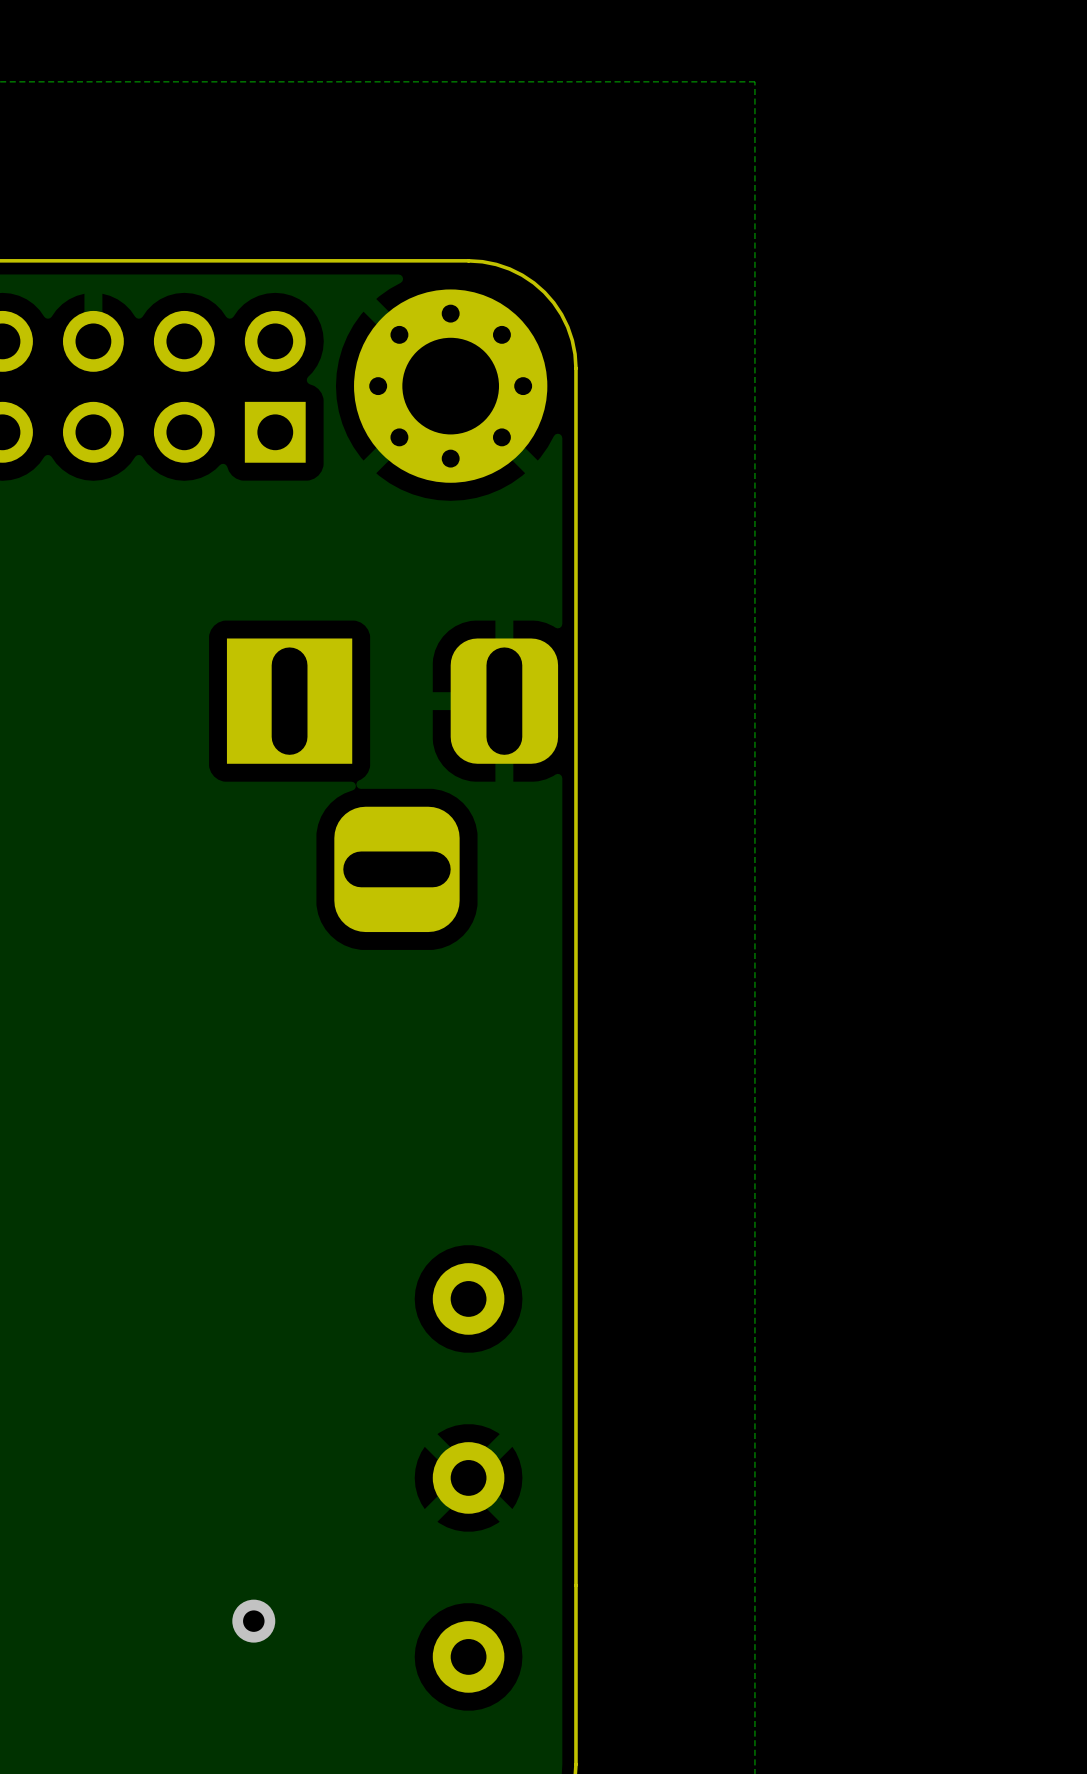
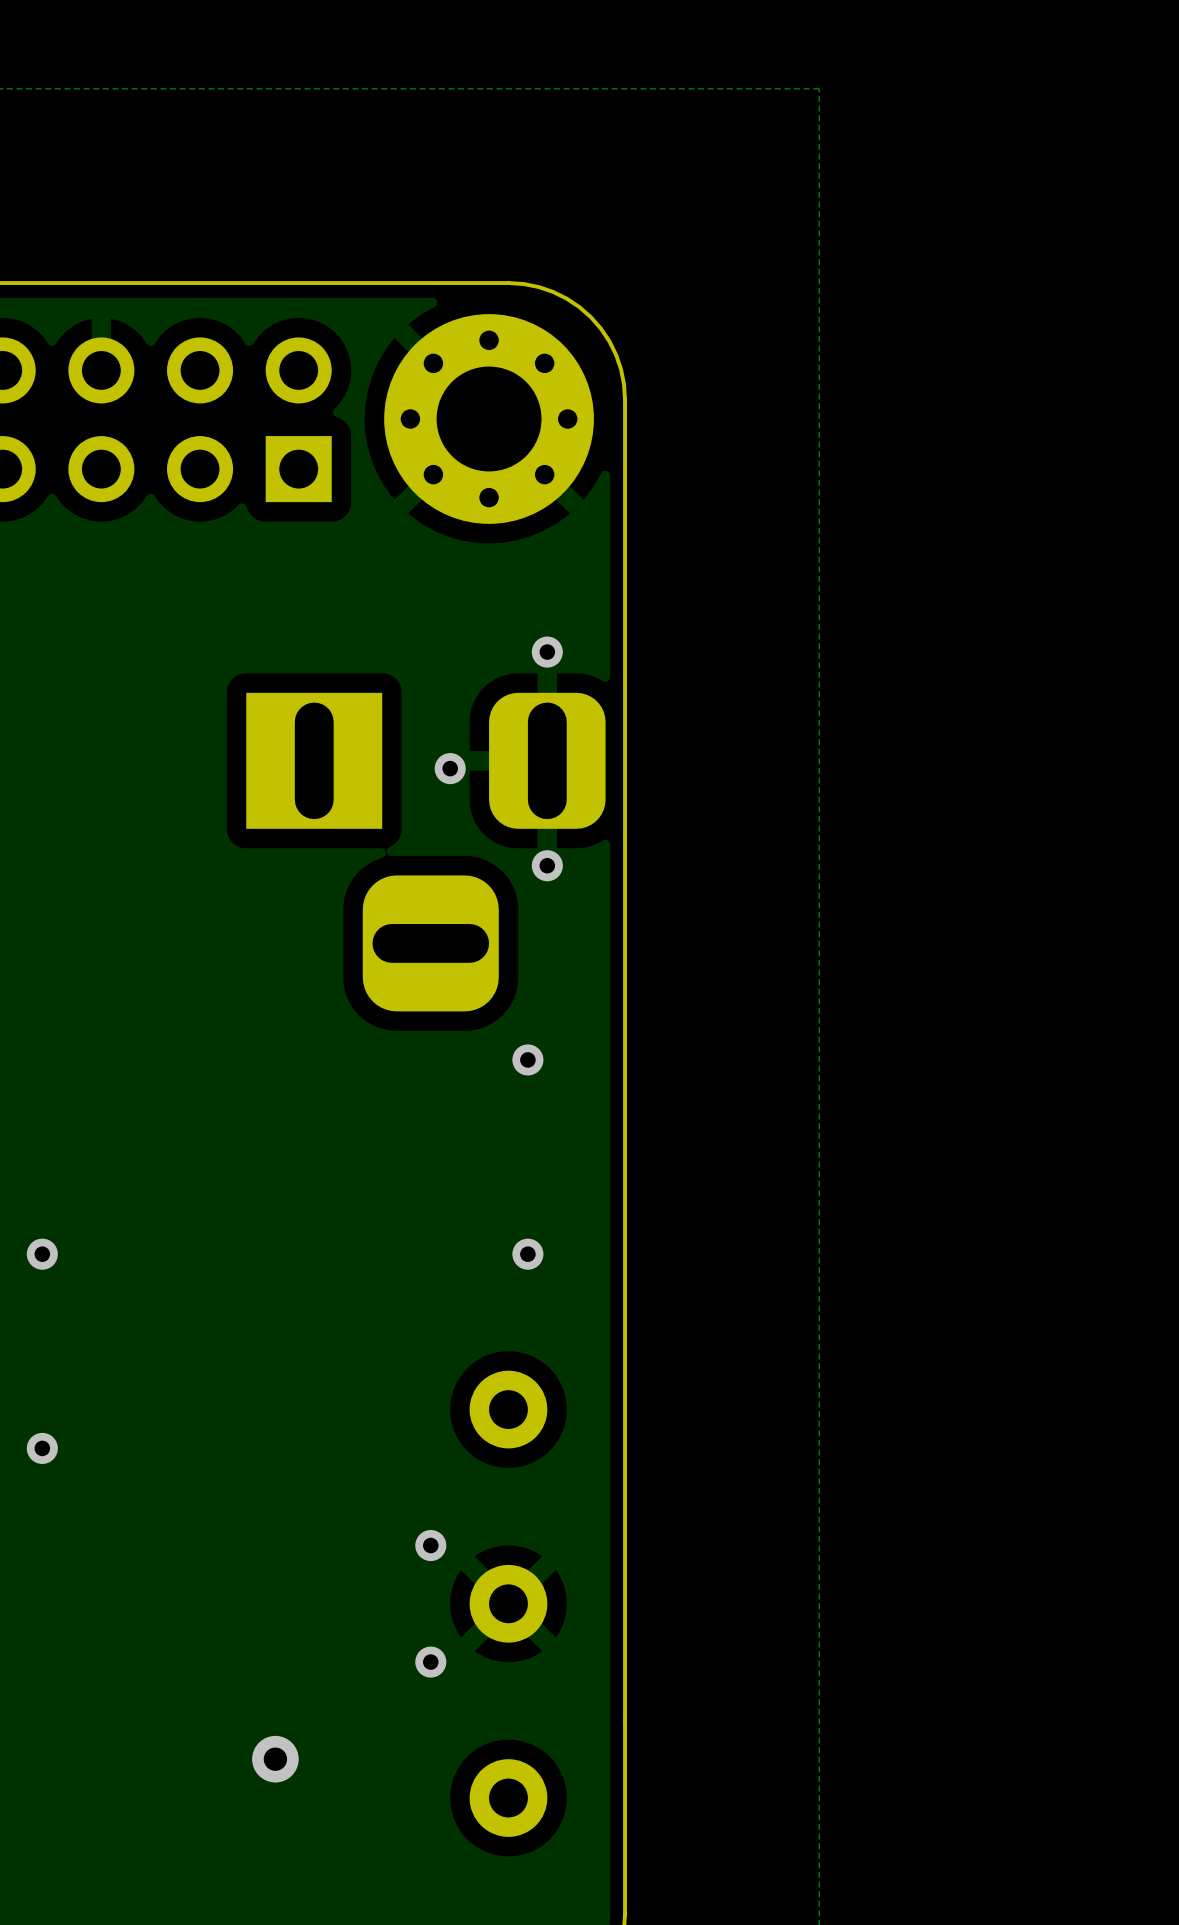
via: none -> (547, 652)
via: none -> (450, 768)
via: none -> (547, 865)
via: none -> (527, 1059)
via: none -> (42, 1254)
via: none -> (527, 1254)
via: none -> (42, 1448)
via: none -> (430, 1545)
via: none -> (430, 1662)

